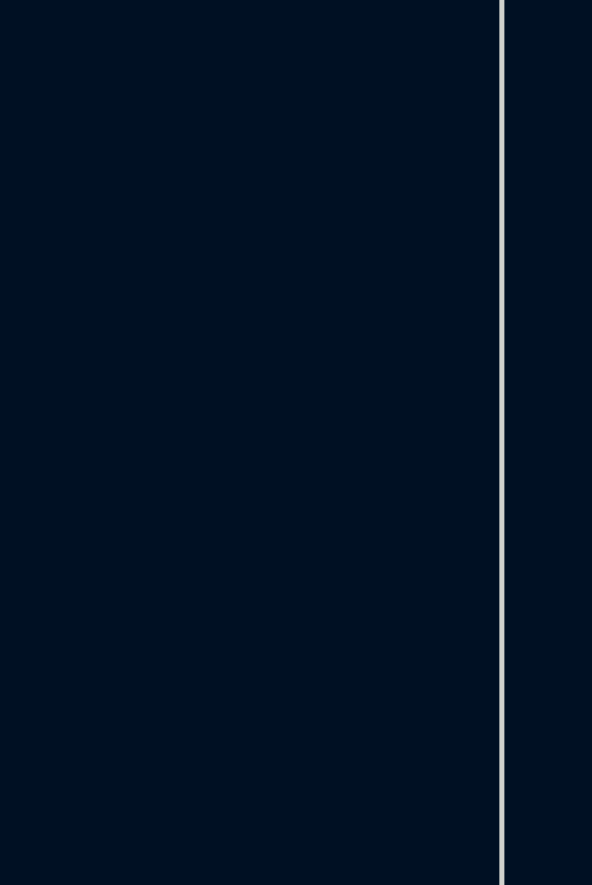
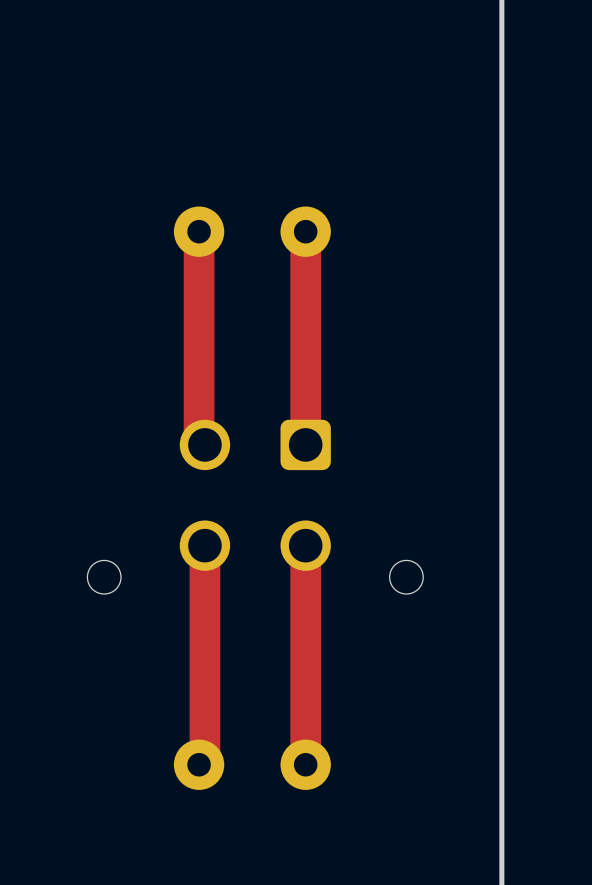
top track: none -> (199, 231) (199, 439) (204, 444)
part: none -> (199, 231)
top track: none -> (305, 231) (305, 444)
part: none -> (305, 231)
part: none -> (255, 506)
top track: none -> (204, 545) (204, 758) (199, 764)
top track: none -> (305, 545) (305, 764)
part: none -> (199, 764)
part: none -> (305, 764)

